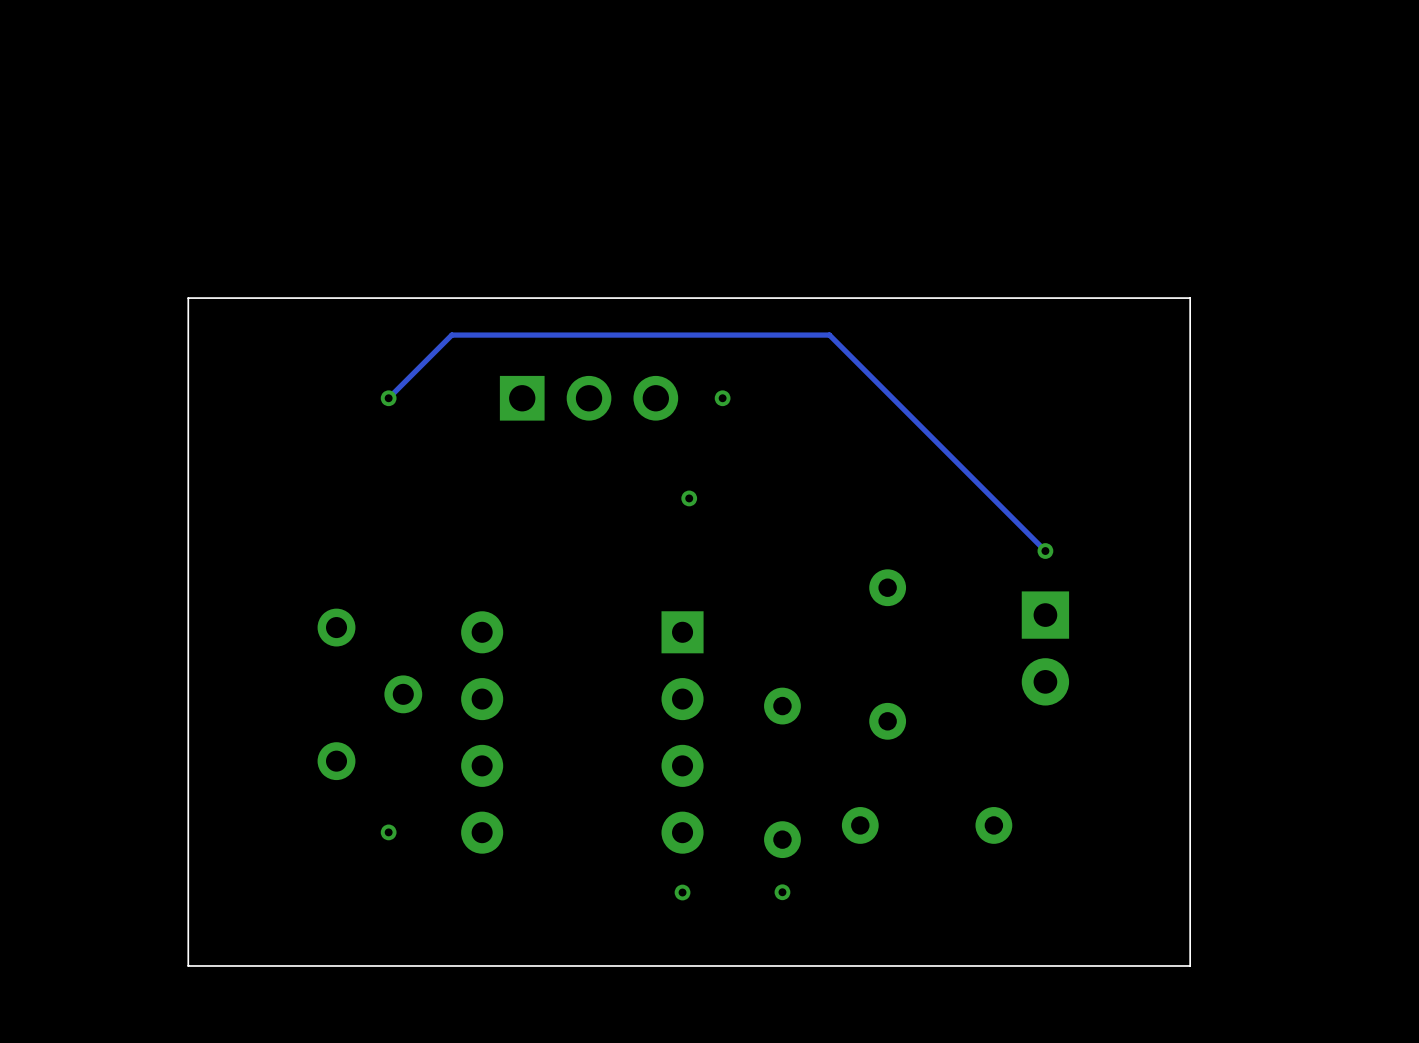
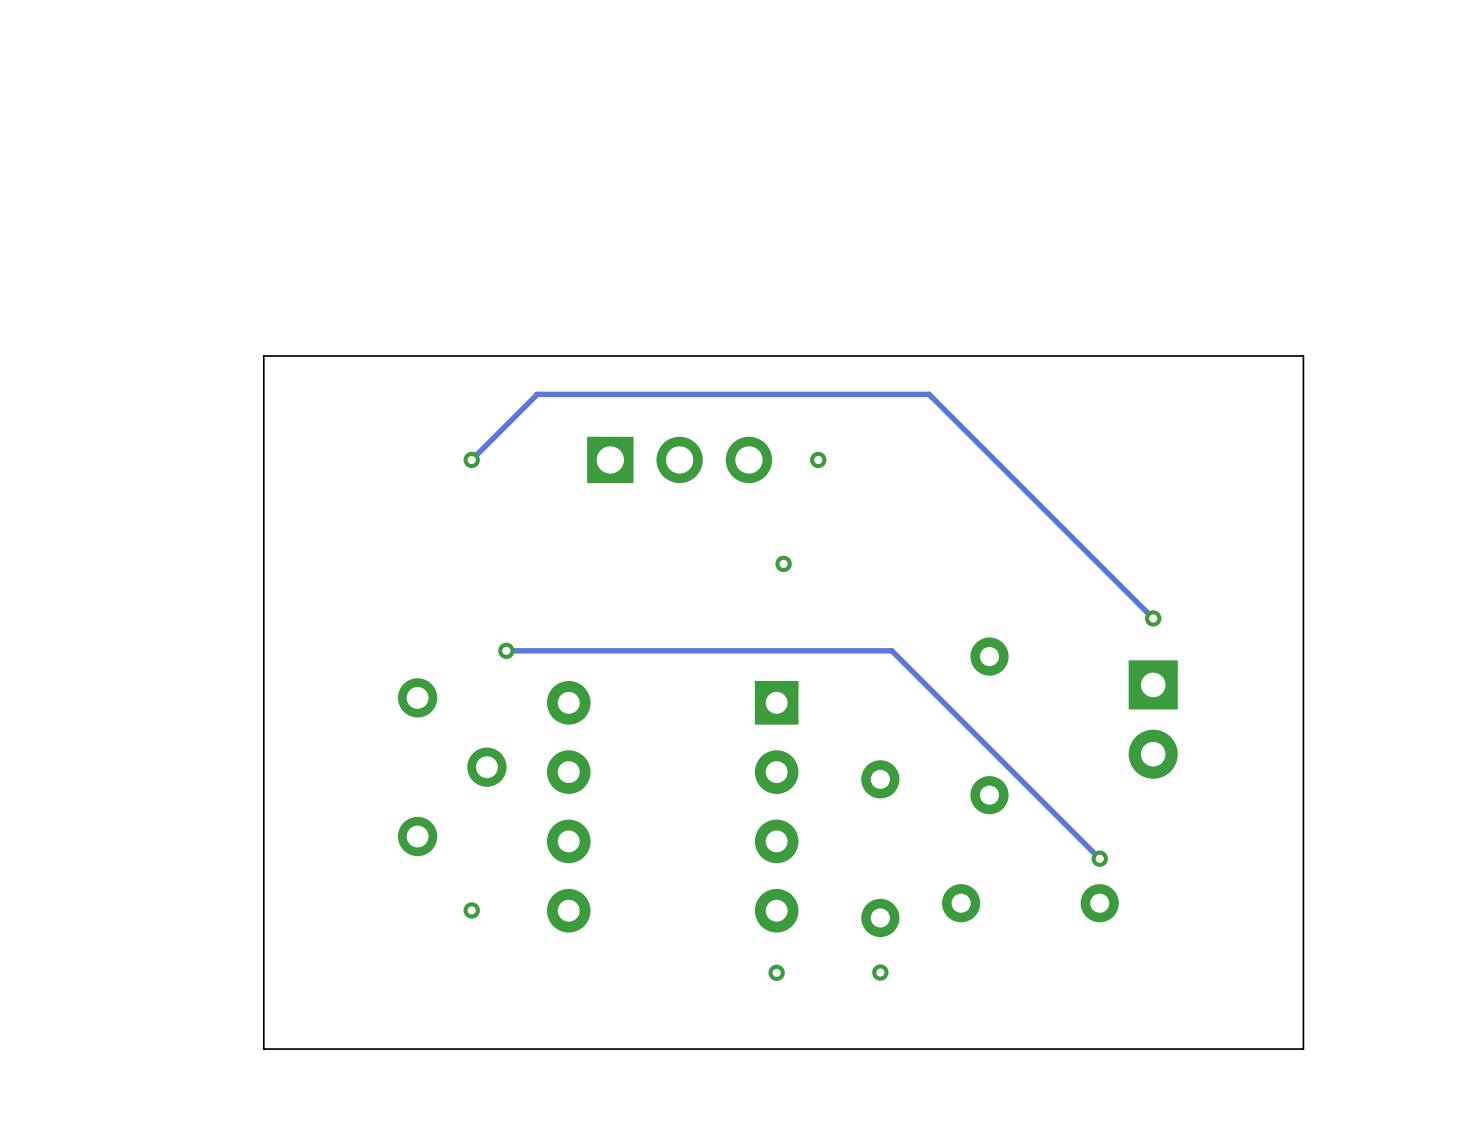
track: none -> (506, 650) (891, 650) (1099, 858)
via: none -> (506, 650)
via: none -> (1099, 858)

